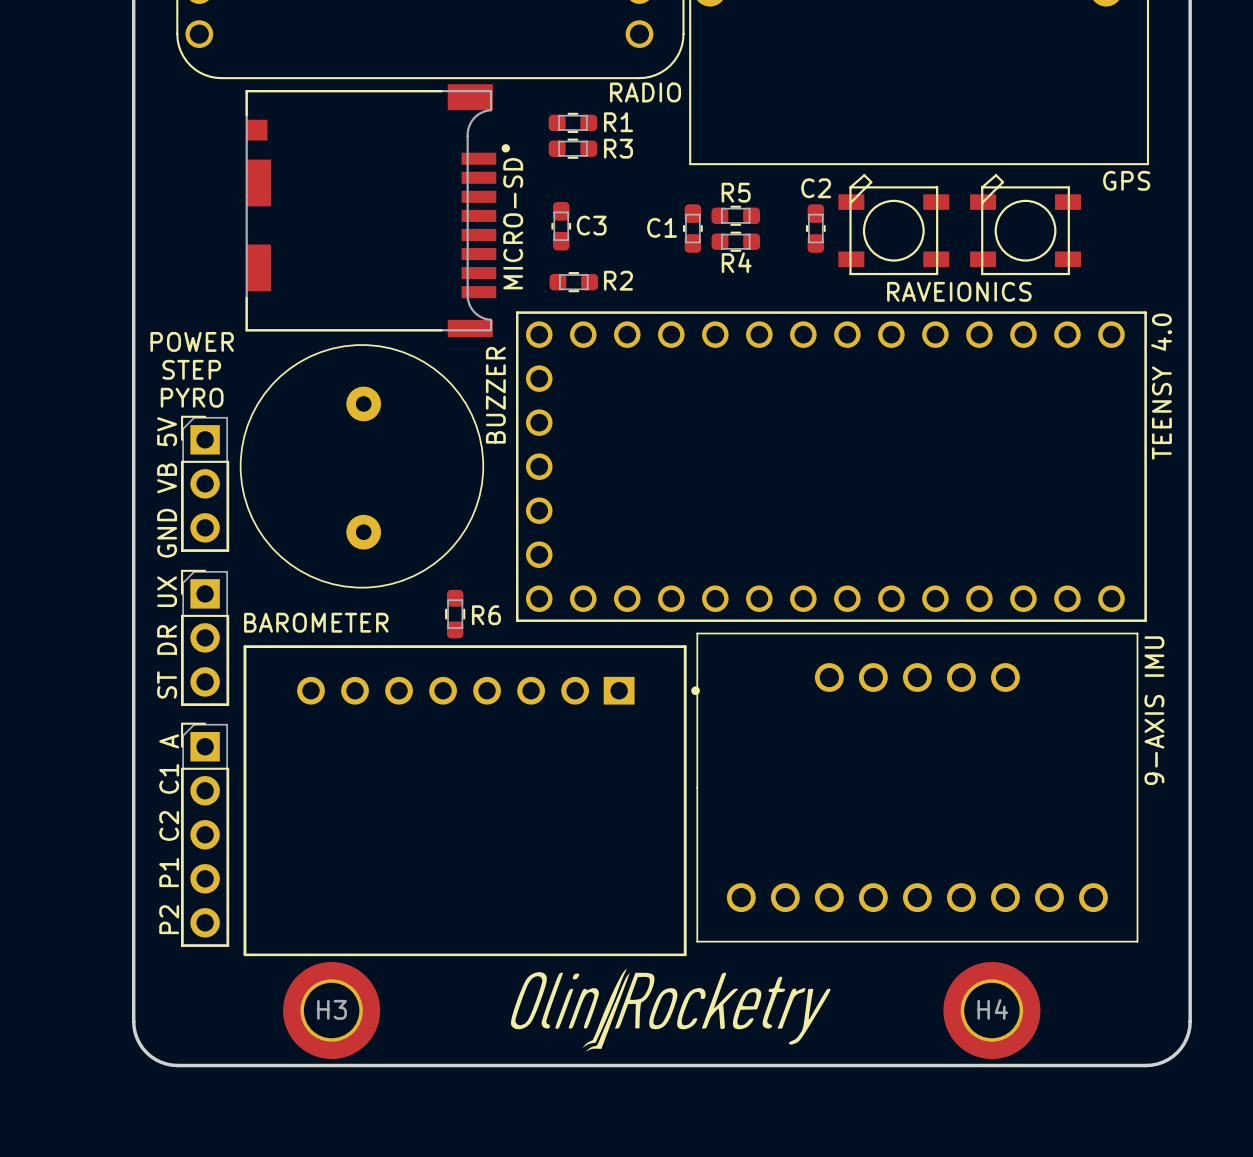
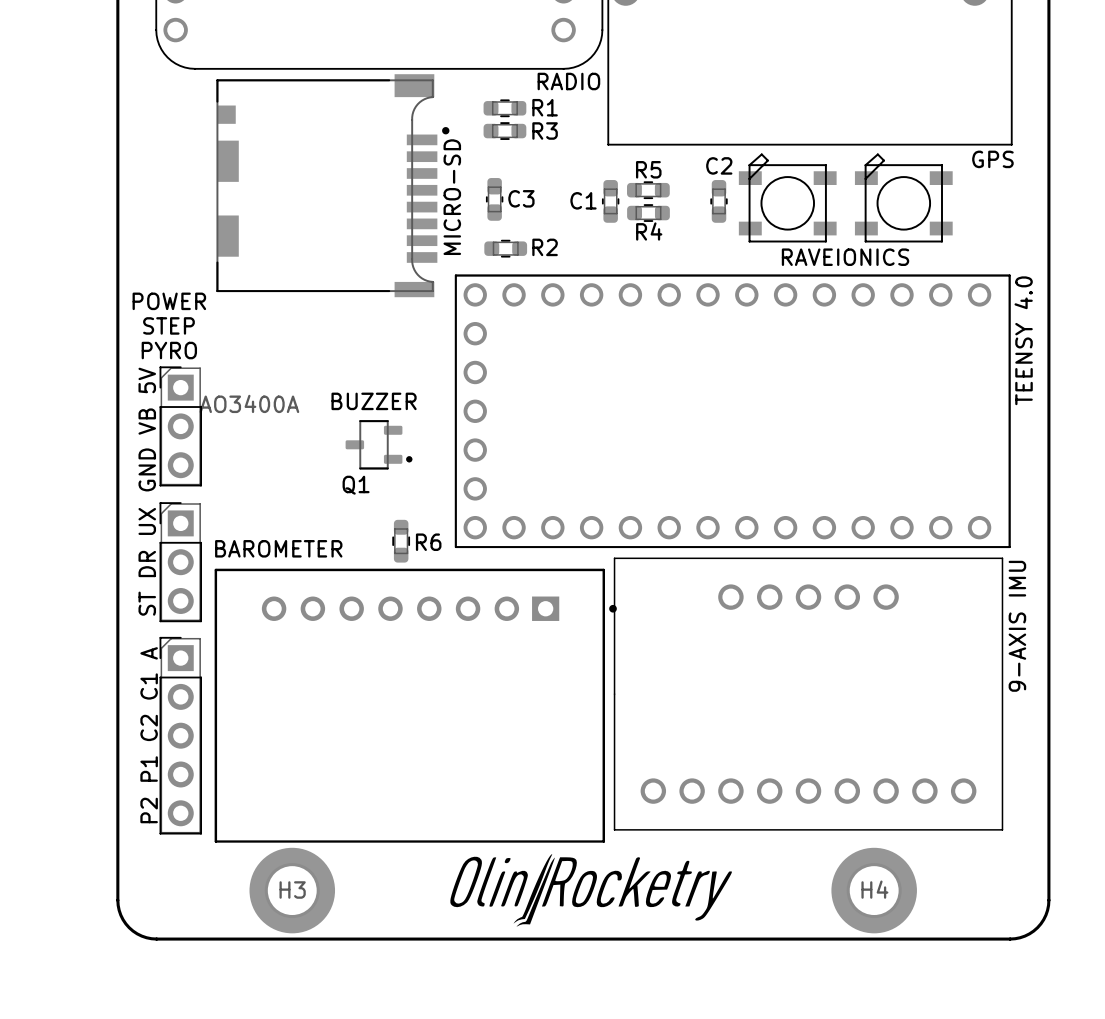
text rotation: 0° (495, 395) -> 90° clockwise (374, 401)
part: (361, 466) -> none
Q1: none -> AO3400A (378, 444)

